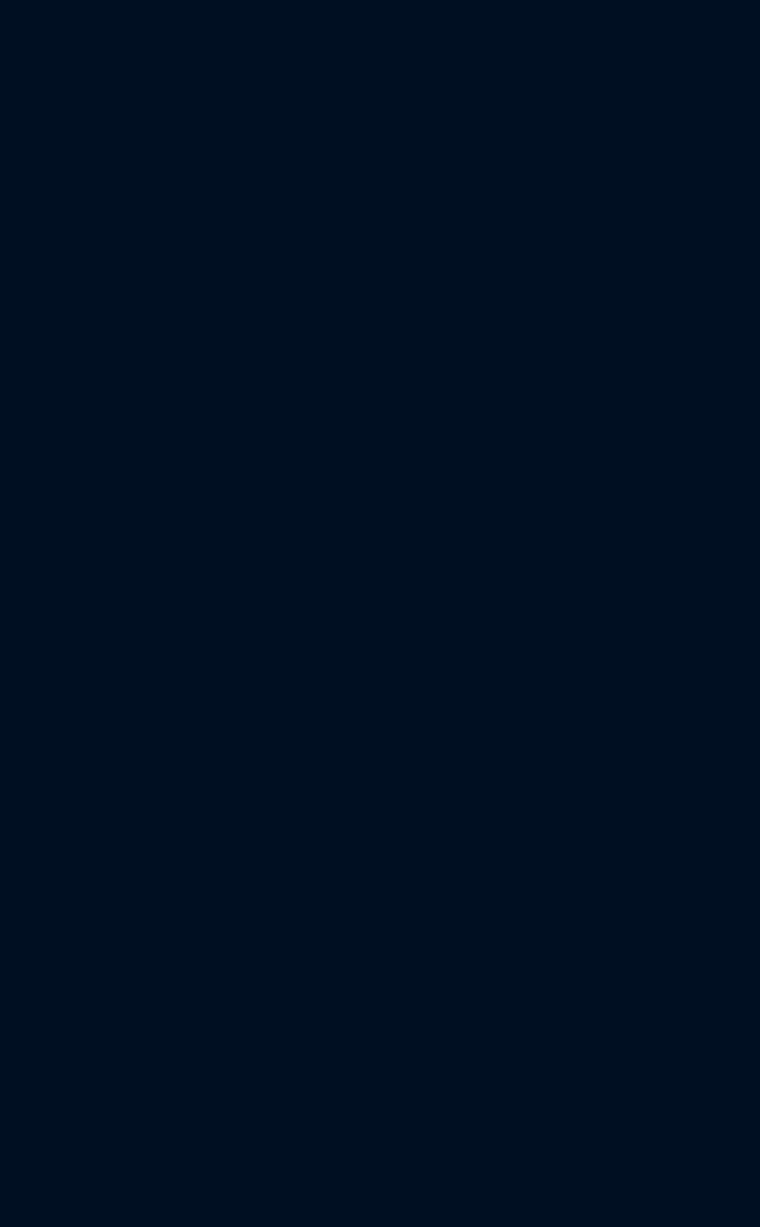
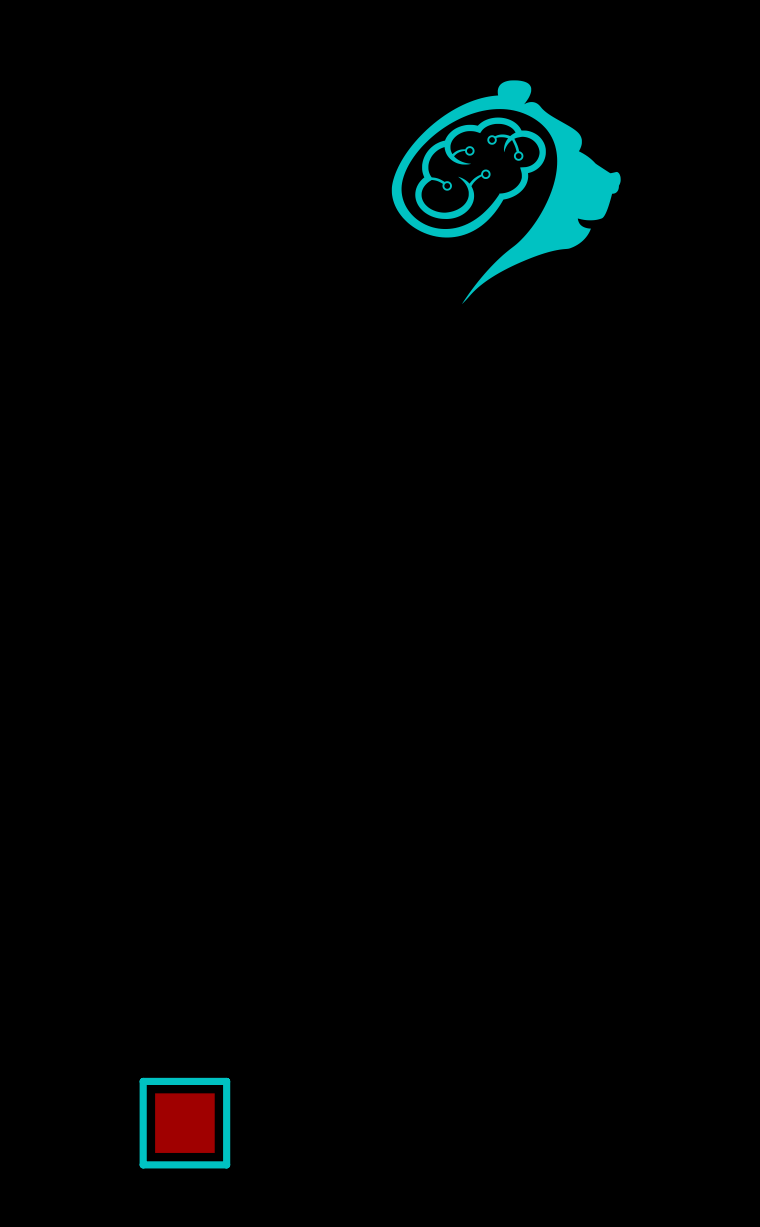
drawing: none -> [391, 80, 621, 304]
part: none -> (184, 1123)

